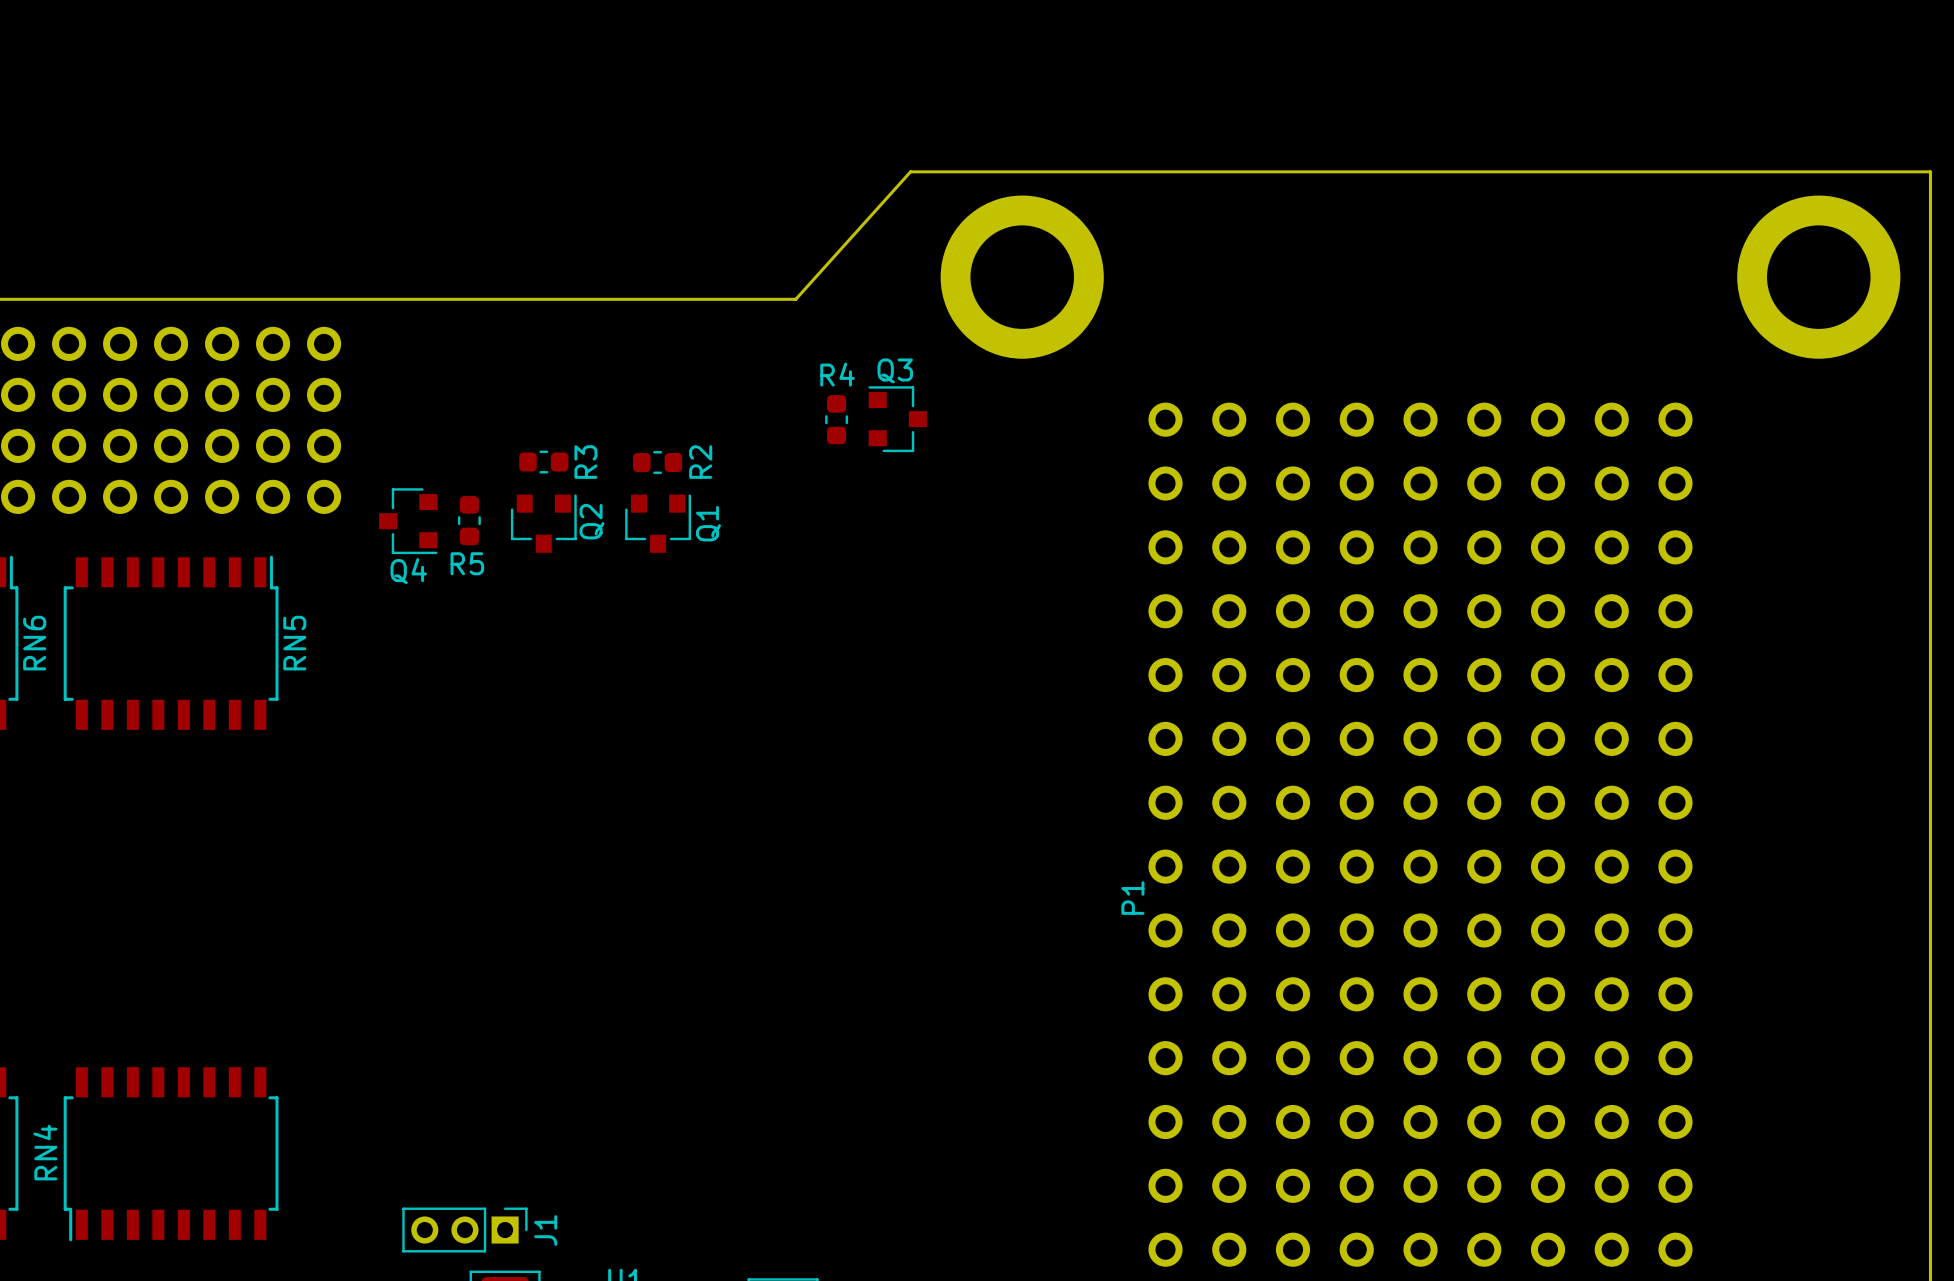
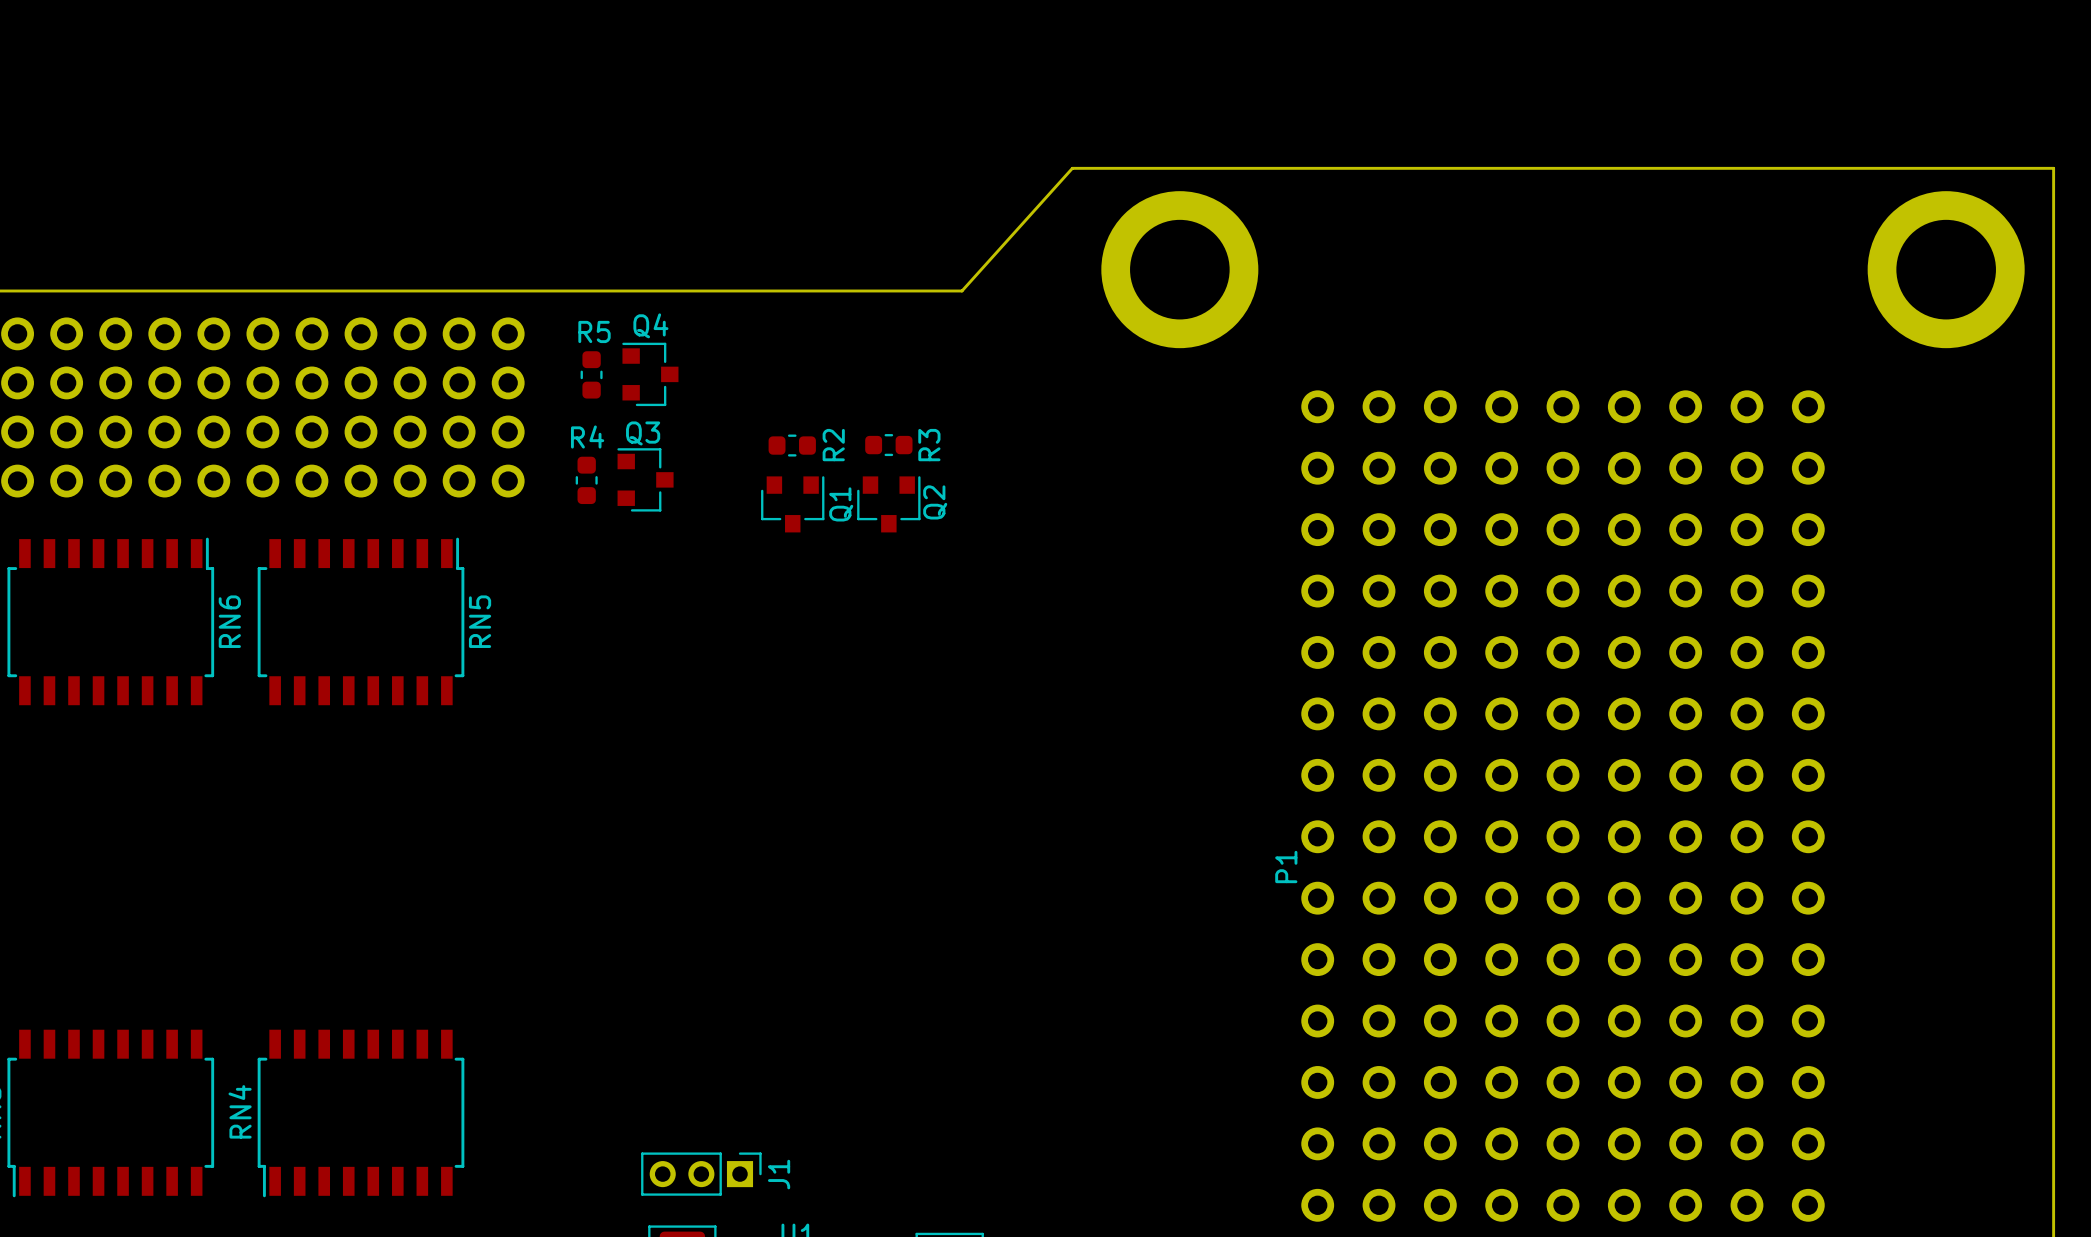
R4 position: (836, 419) -> (586, 480)
Q3 position: (897, 419) -> (645, 479)
R3 position: (543, 462) -> (888, 445)
R2 position: (657, 462) -> (792, 445)
R5 position: (469, 520) -> (591, 374)
Q4 rotation: 0° (408, 521) -> 180° (650, 374)
Q4 position: (408, 521) -> (650, 374)
Q2 position: (543, 523) -> (888, 504)
Q1 position: (658, 523) -> (792, 504)
R5 name position: R5 (467, 563) -> R5 (594, 331)
J1 position: (464, 1230) -> (701, 1174)

